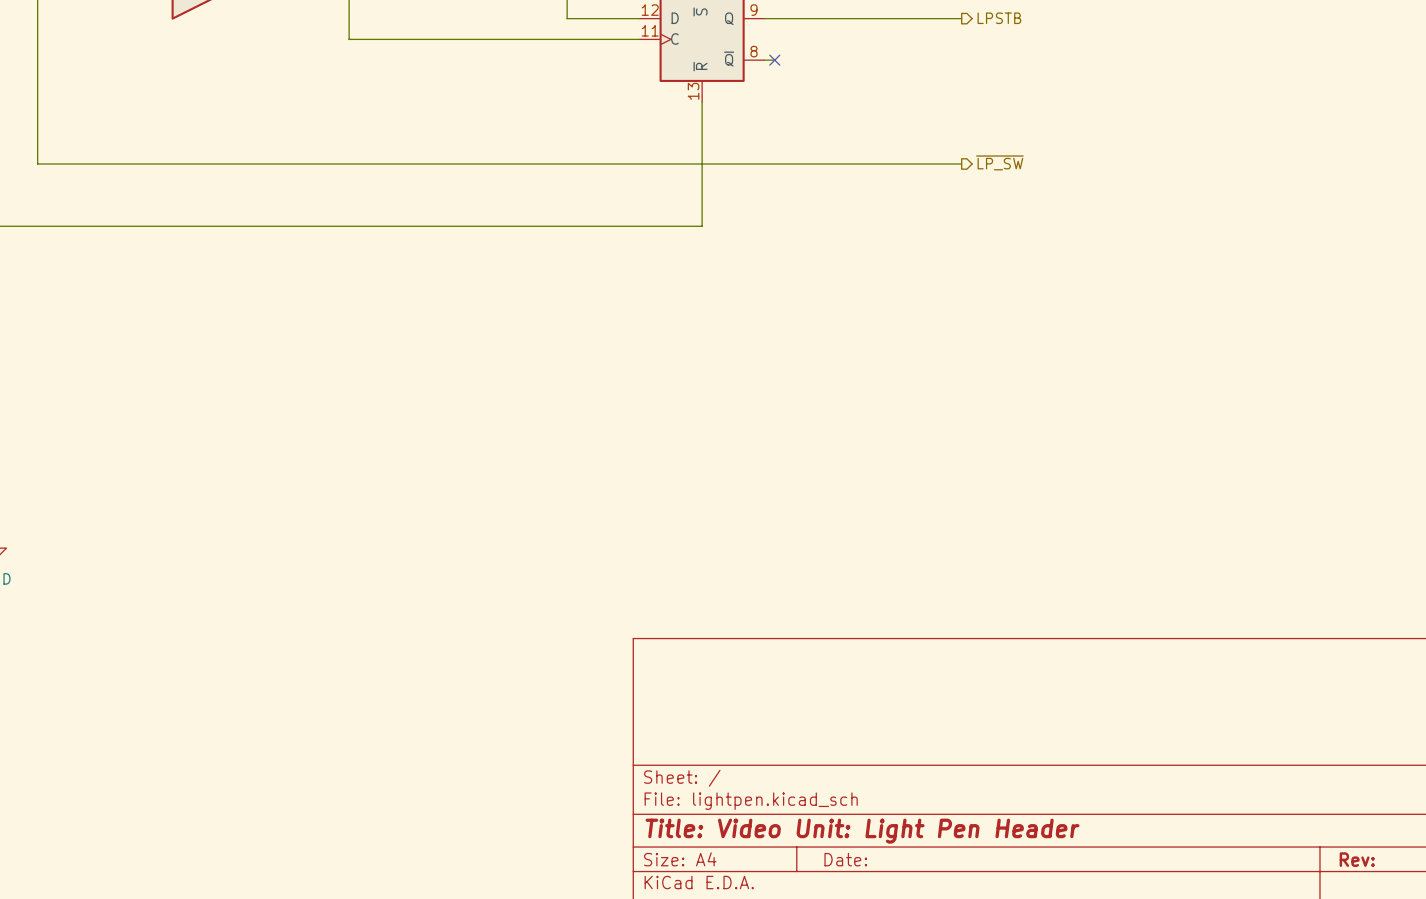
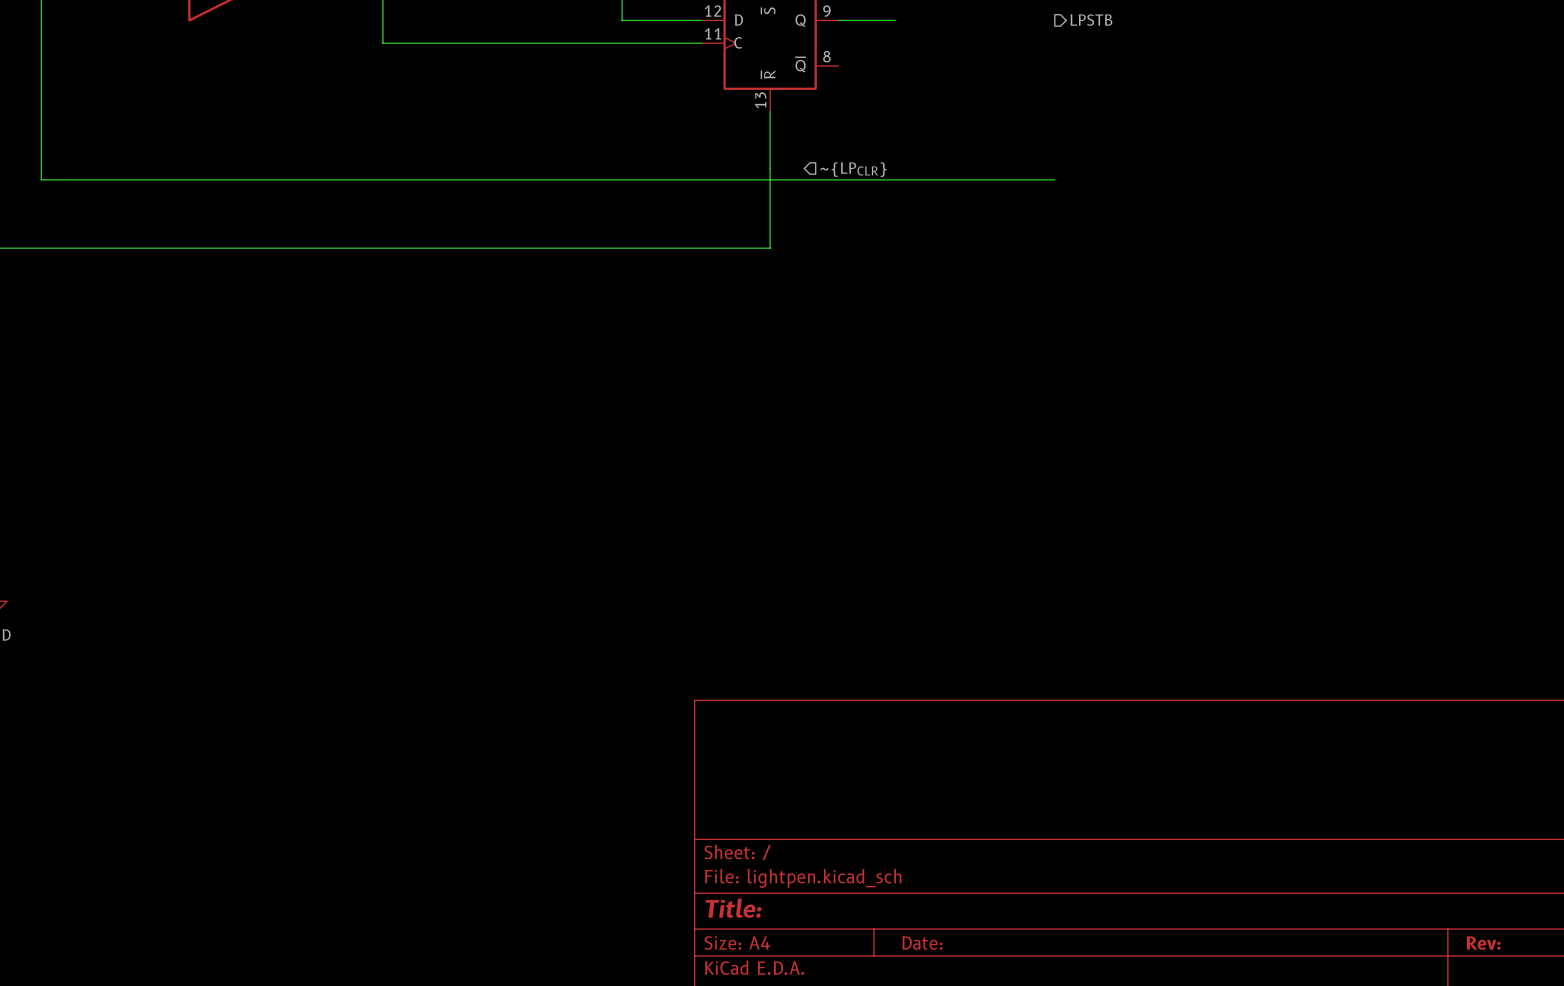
wire: (816, 18) (961, 18) -> none
wire: (764, 60) (774, 60) -> none
no-connect mark: (774, 60) -> none
hierarchical label: none -> ~{LPCLR} (853, 169)
hierarchical label: ~{LP_SW} (999, 162) -> none
title block: Title: Video Unit: Light Pen Header (862, 831) -> Title: (733, 908)

